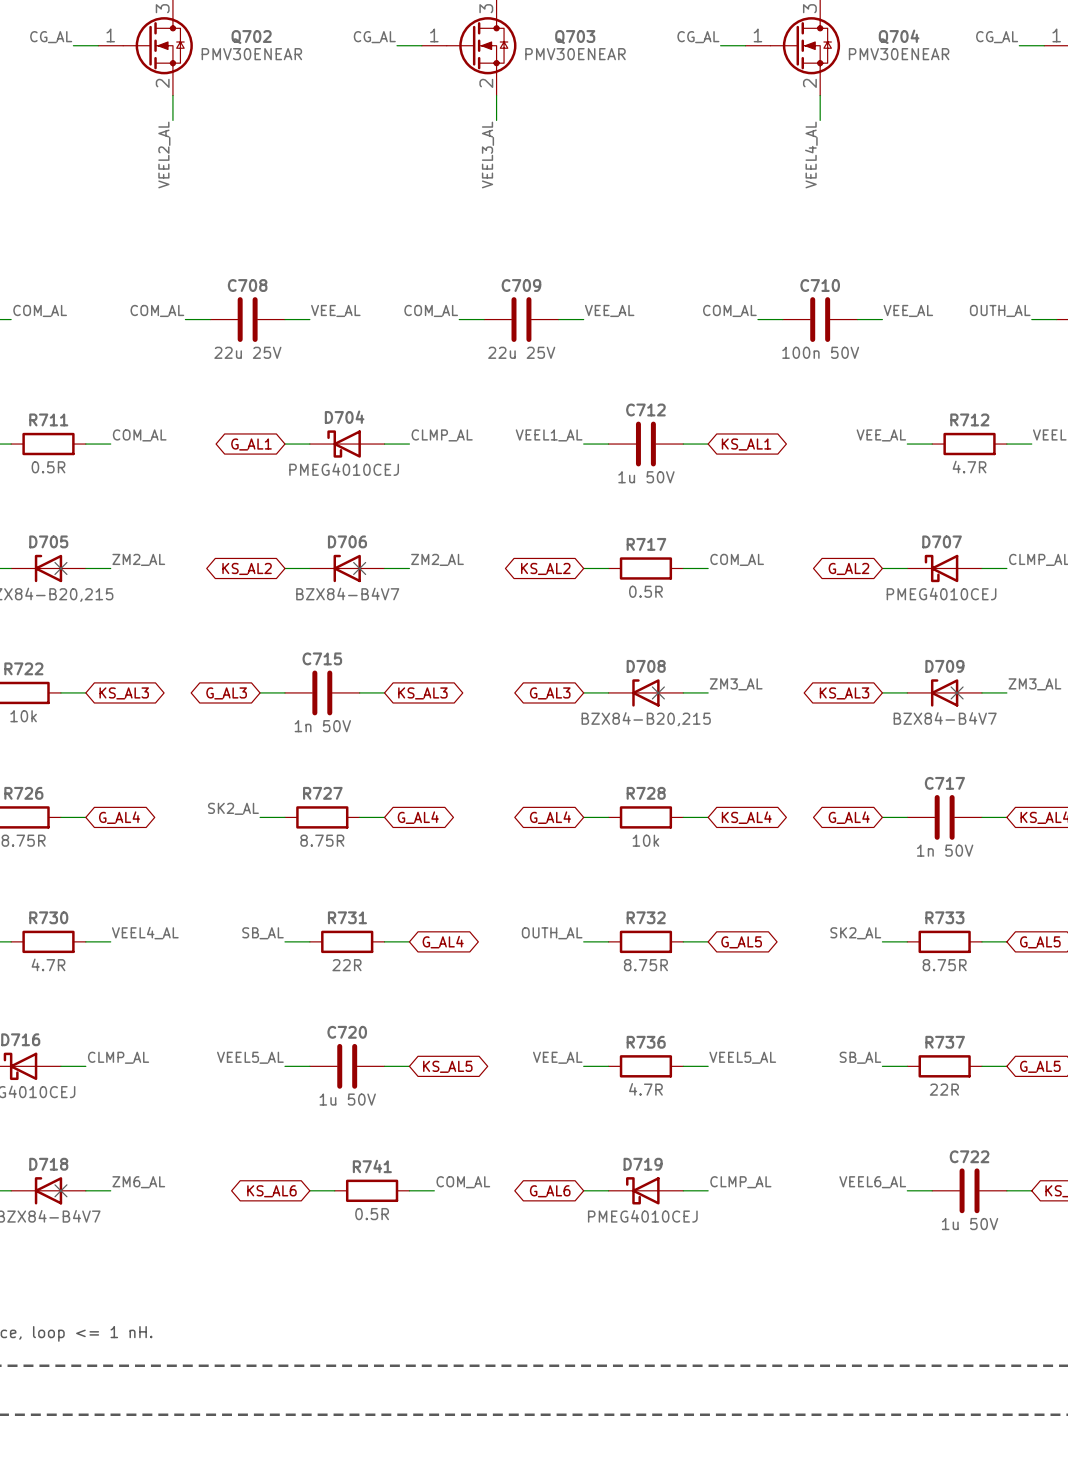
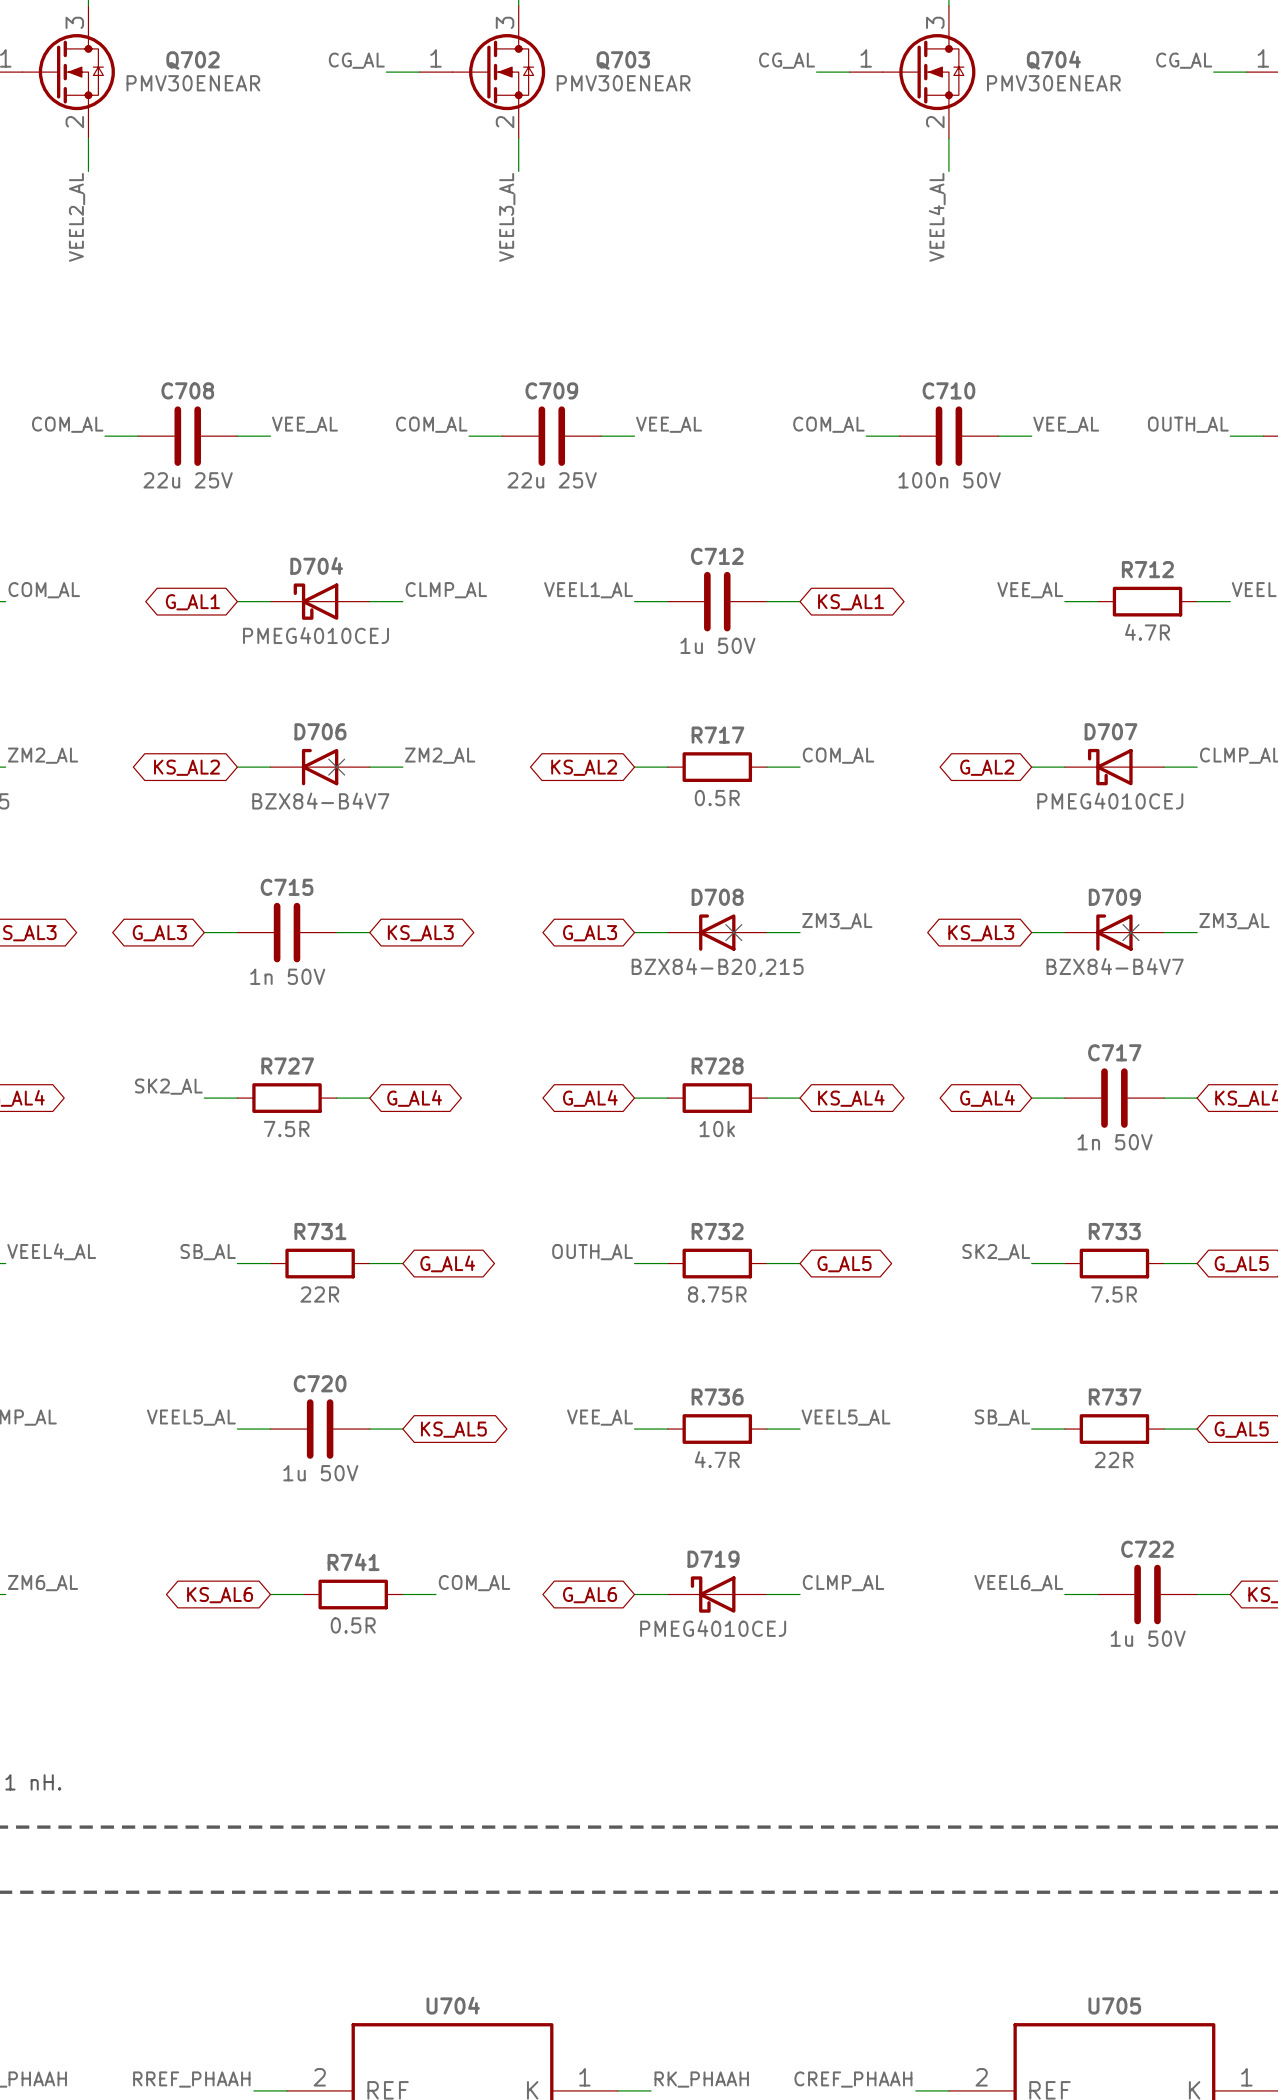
R727 value: 8.75R (322, 840) -> 7.5R (286, 1129)
R733 value: 8.75R (944, 965) -> 7.5R (1114, 1294)

